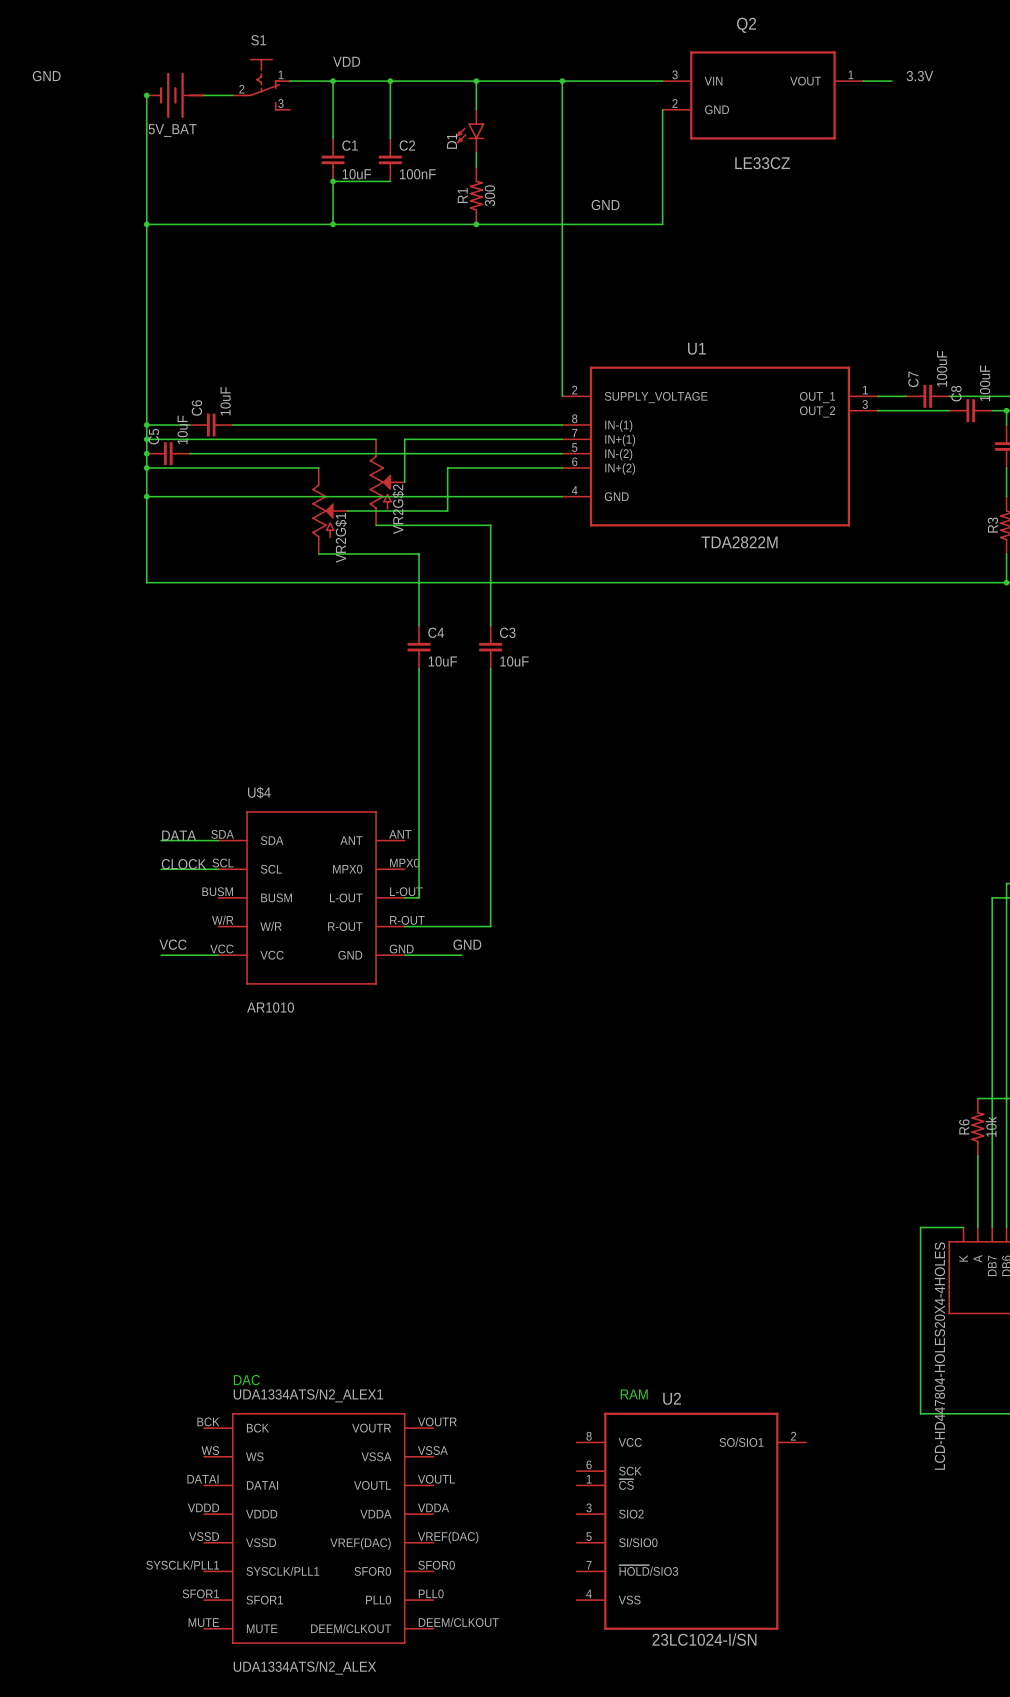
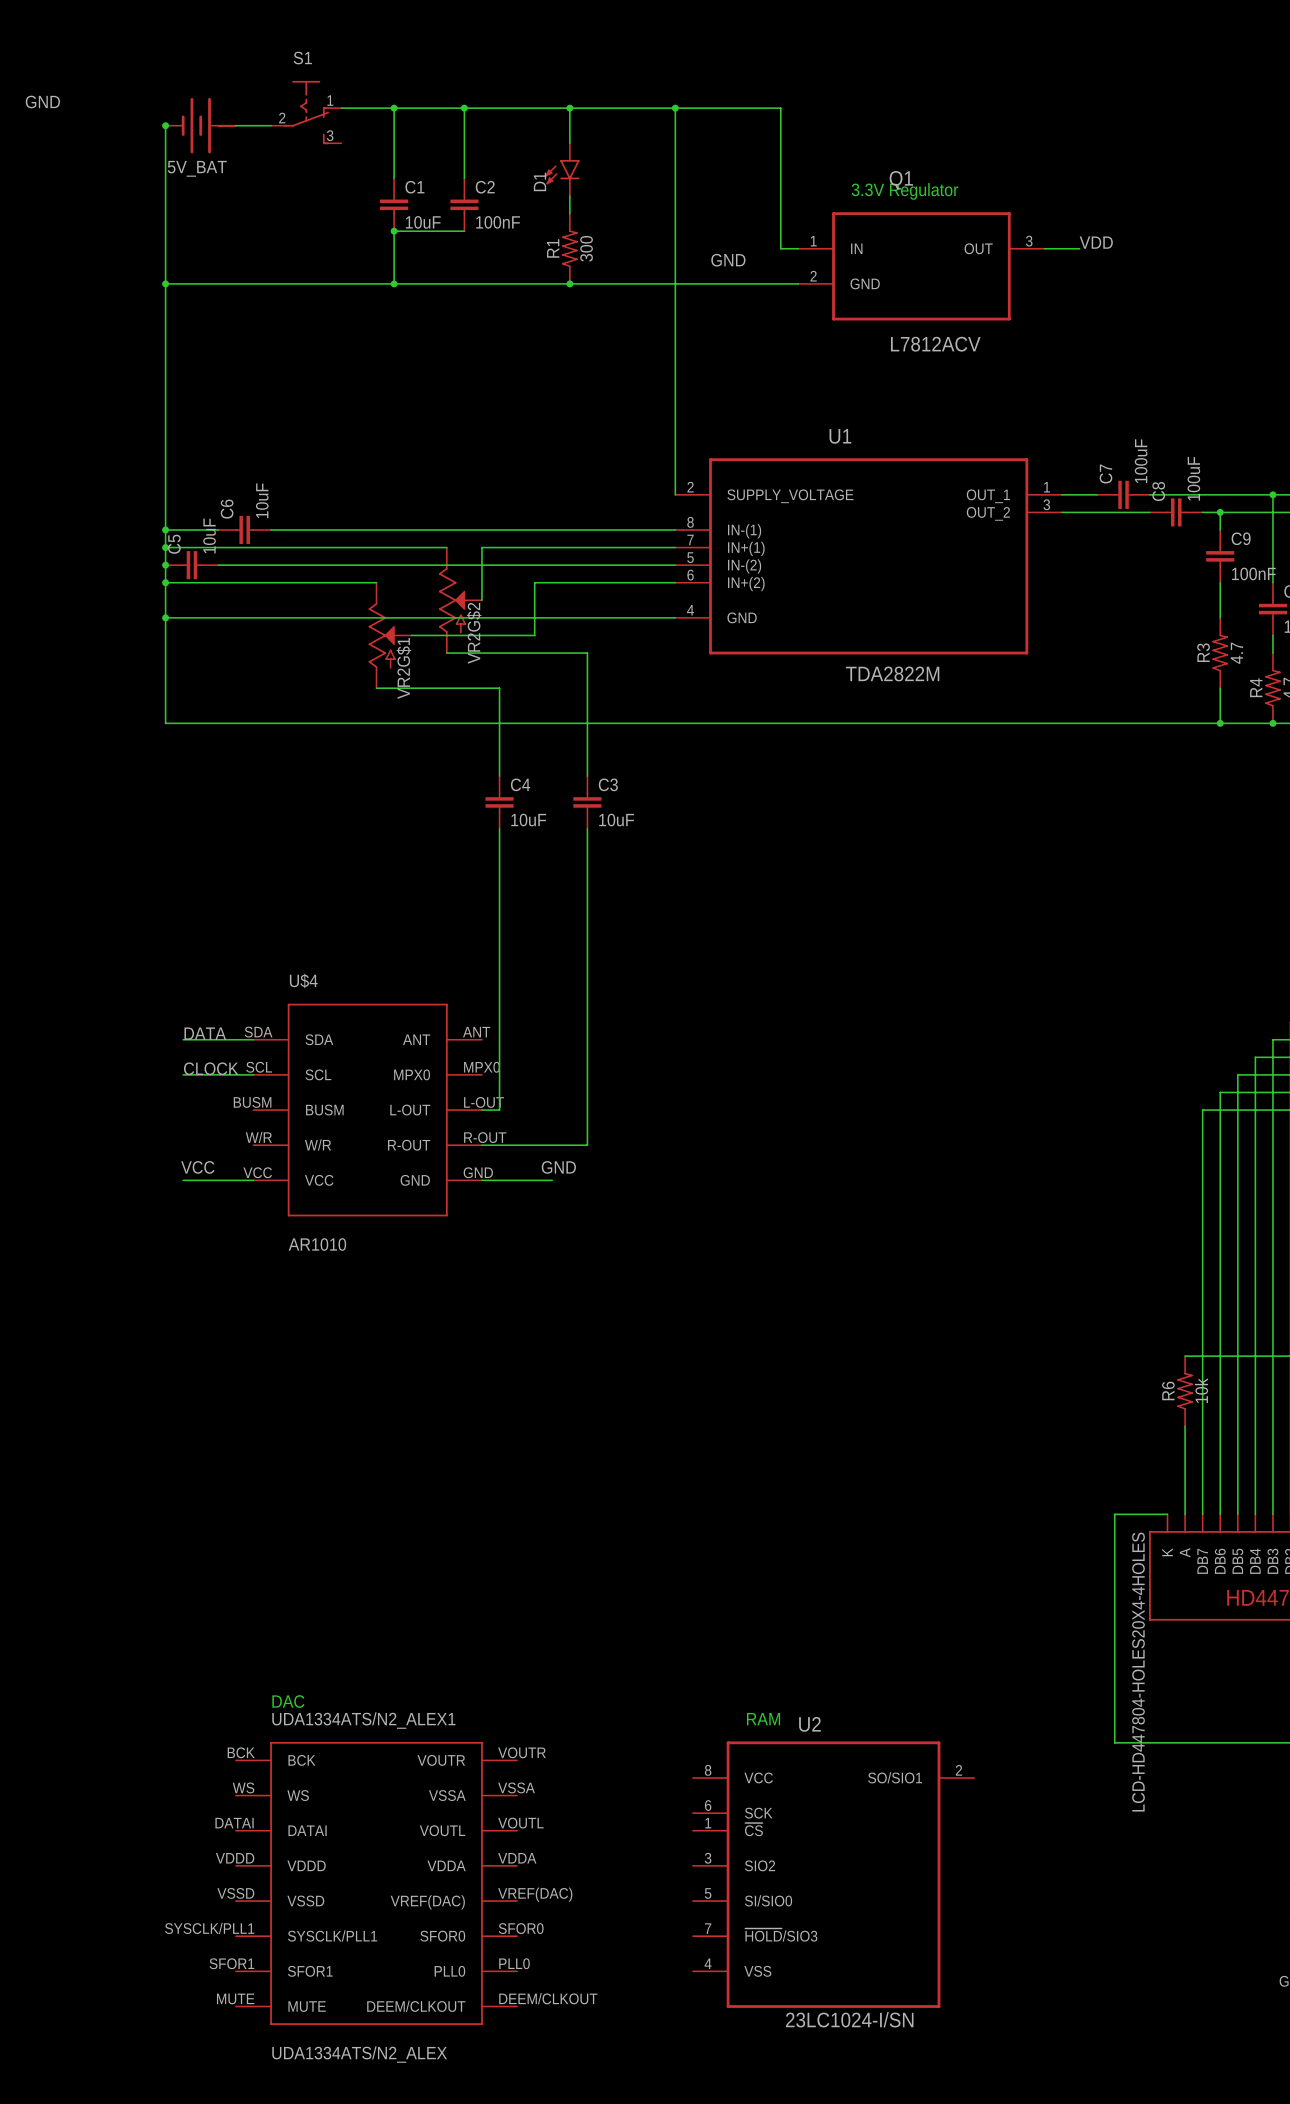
label: VDD (346, 61) -> none
label: 3.3V (919, 76) -> none
wire: (648, 81) (662, 81) -> (780, 108) (780, 248) (798, 248)
wire: (863, 81) (891, 81) -> (1044, 248) (1079, 248)
Q2: LE33CZ (762, 95) -> none
wire: (662, 109) (662, 224) -> none
text: none -> 3.3V Regulator (904, 191)
label: none -> VDD (1096, 242)
Q1: none -> L7812ACV (921, 266)

